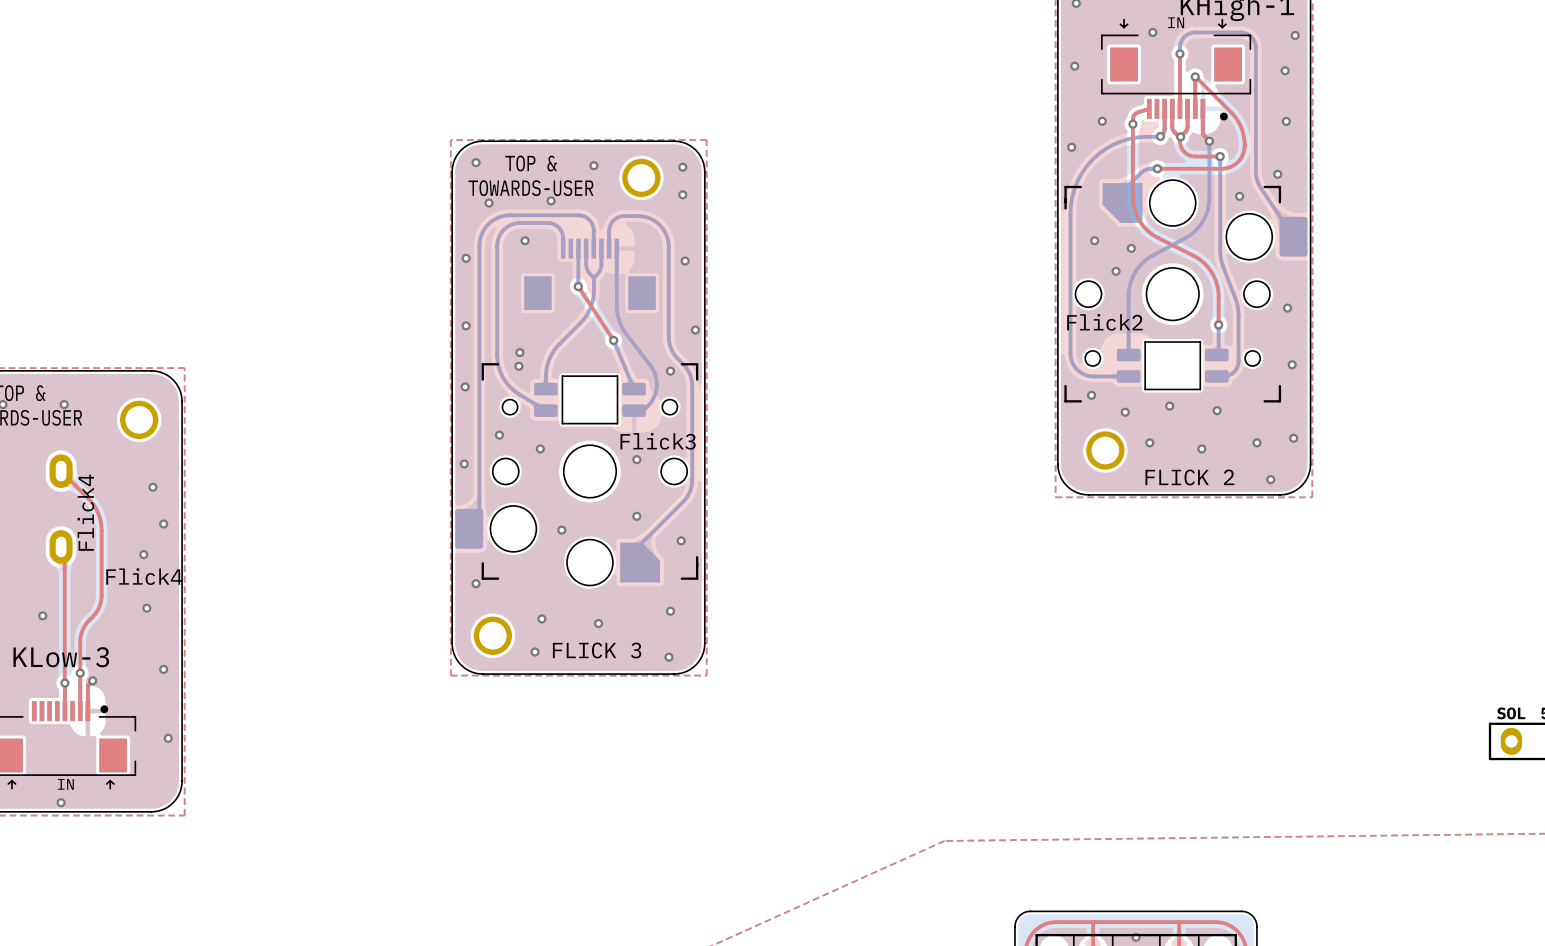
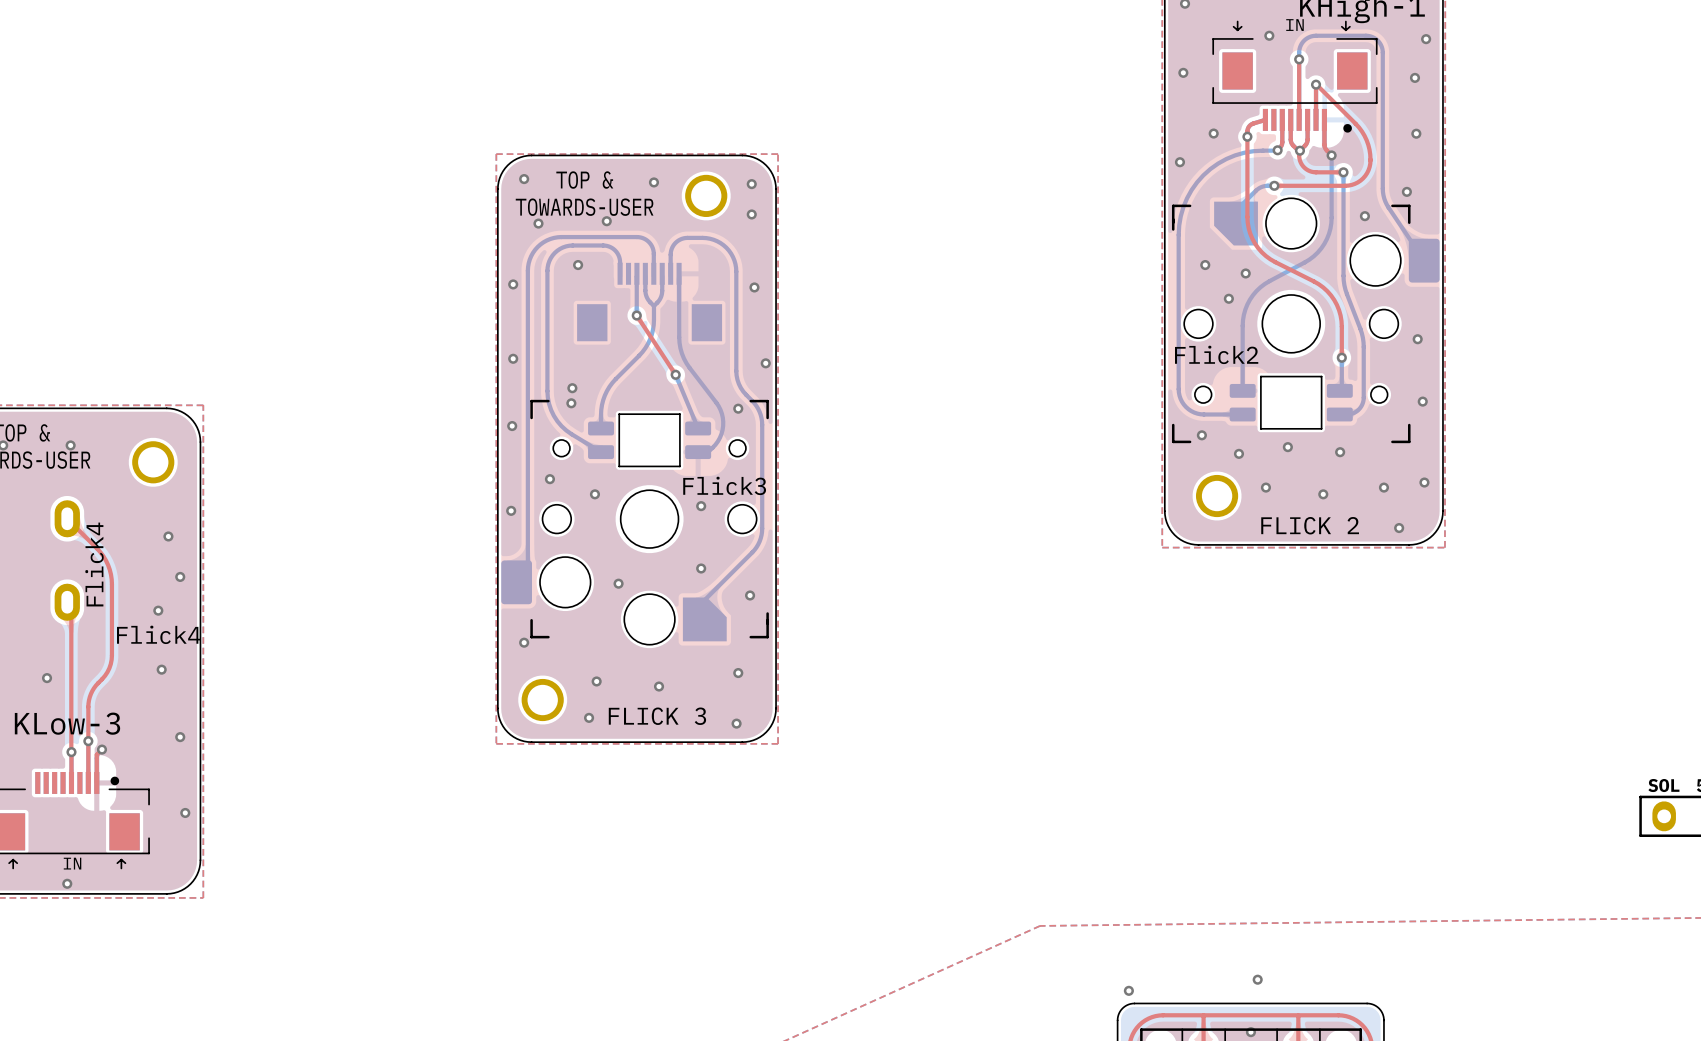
via: none -> (1257, 979)
via: none -> (1128, 990)

